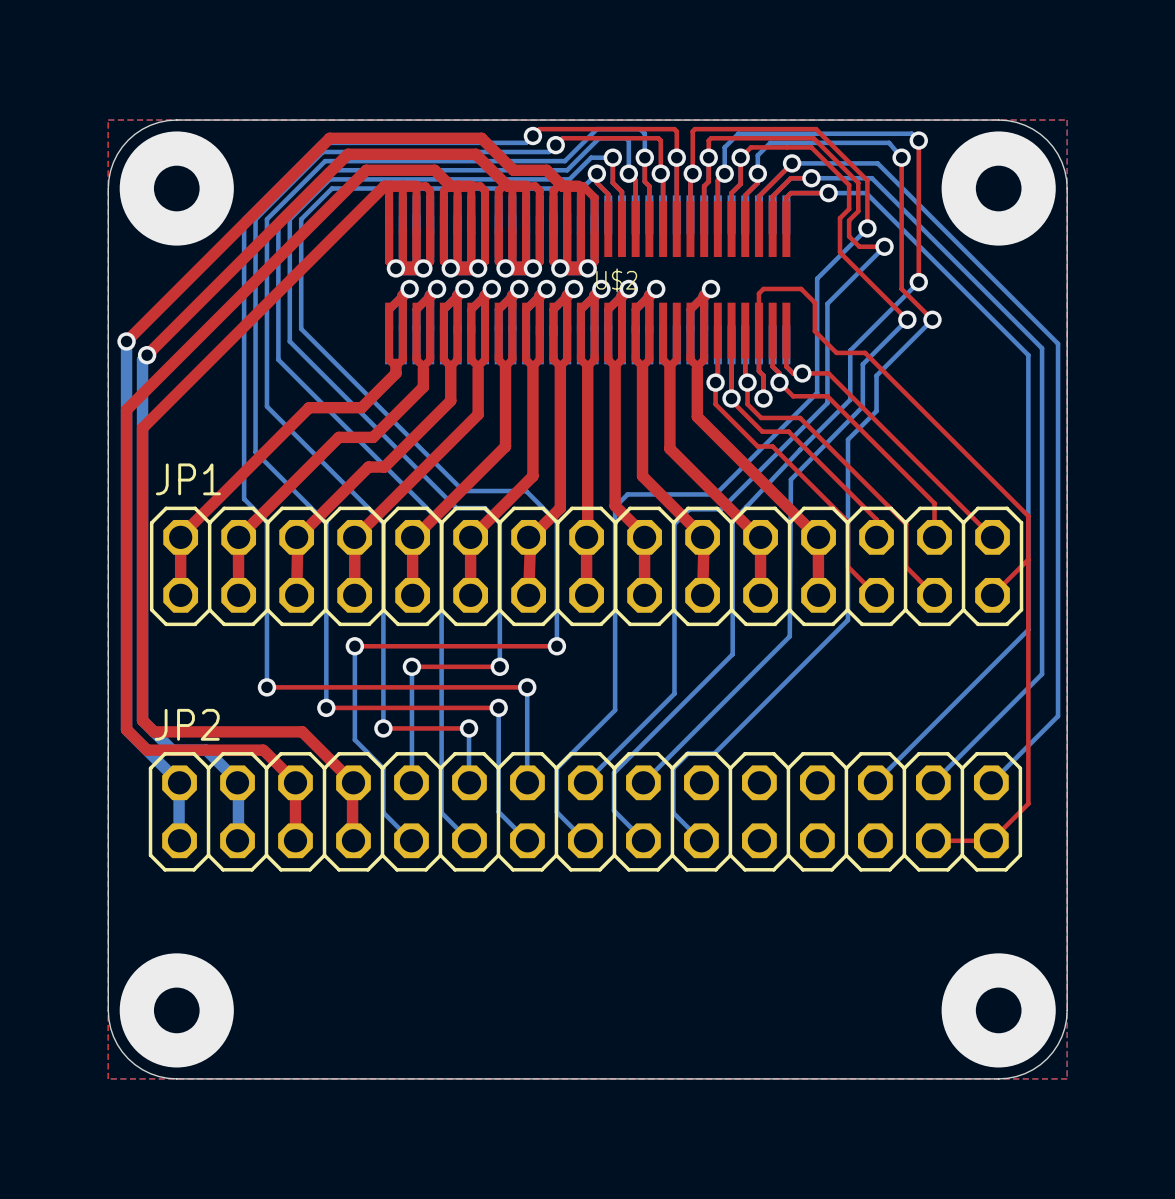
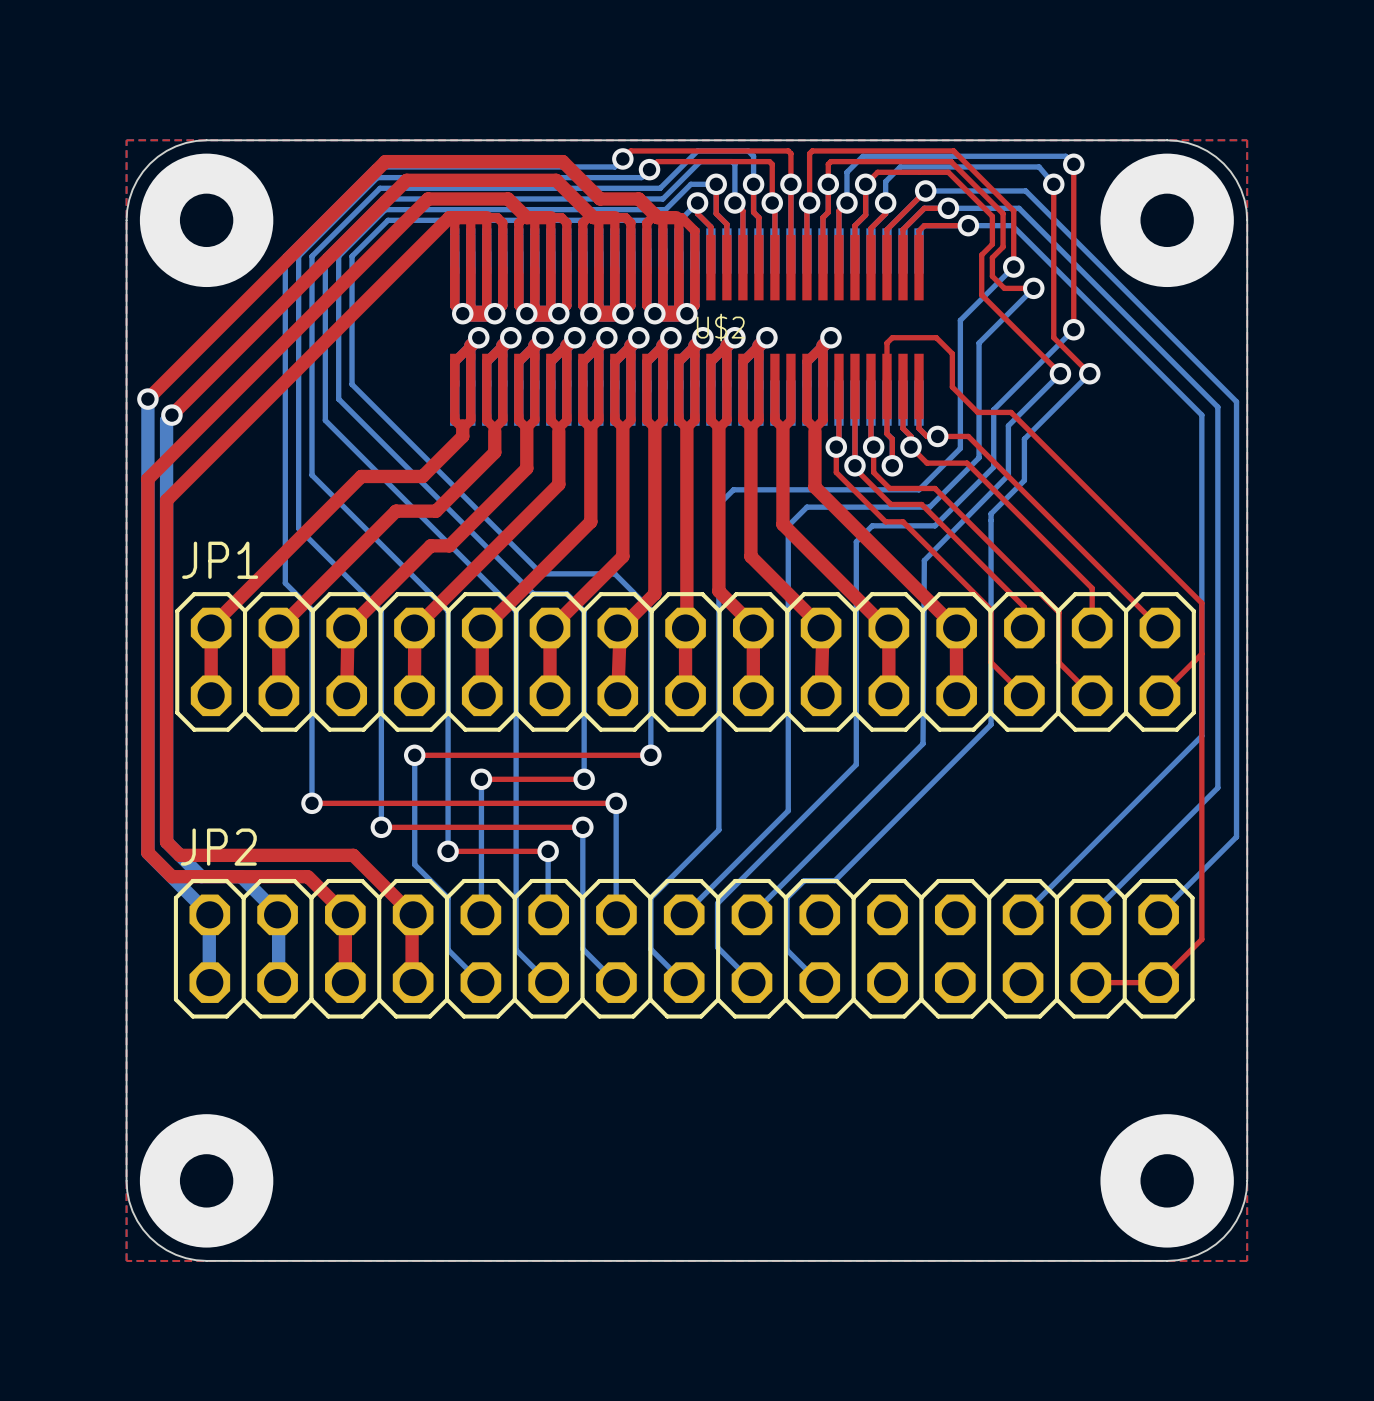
bottom track: (821, 274) (817, 278) (817, 392) (715, 494) (627, 494) (615, 507) -> (960, 320) (960, 448) (919, 489) (733, 489) (718, 504) (718, 592)
bottom track: (837, 293) (827, 303) (827, 403) (721, 509) (689, 509) (674, 524) -> (979, 343) (979, 457) (929, 507) (806, 507) (788, 525) (788, 612)
bottom track: (800, 449) (732, 520) -> (935, 525) (872, 525) (856, 541) (856, 608)

